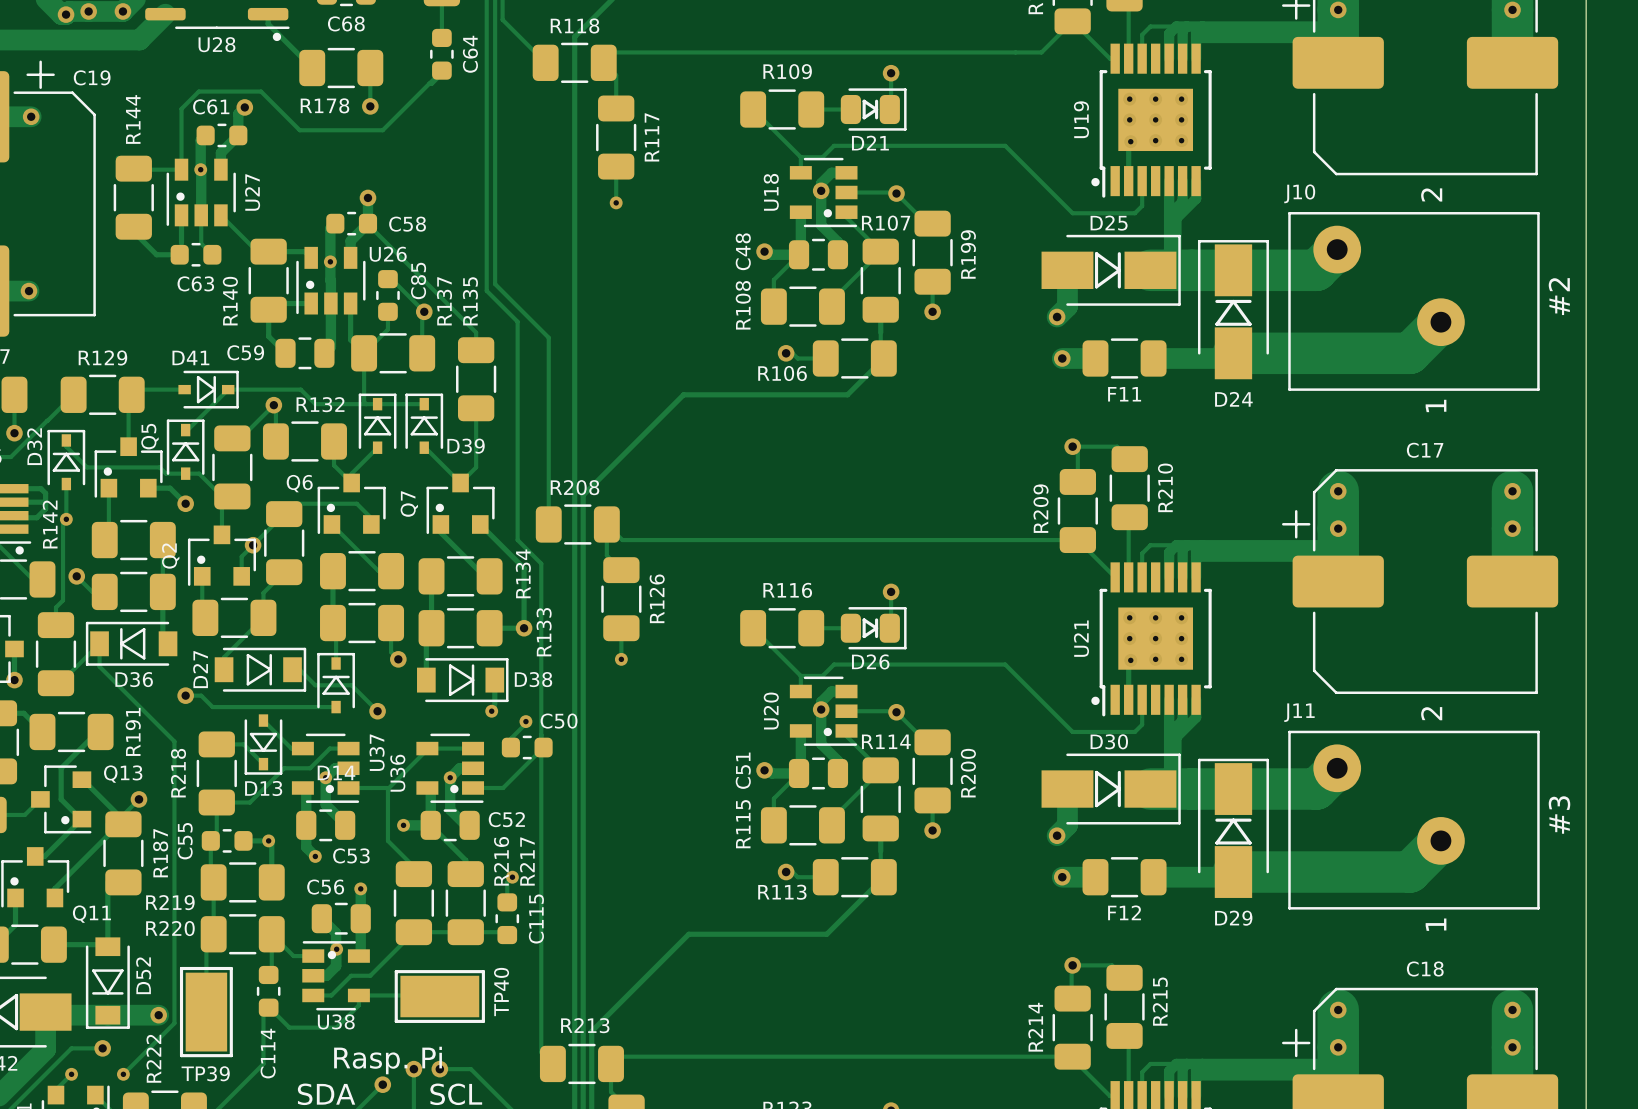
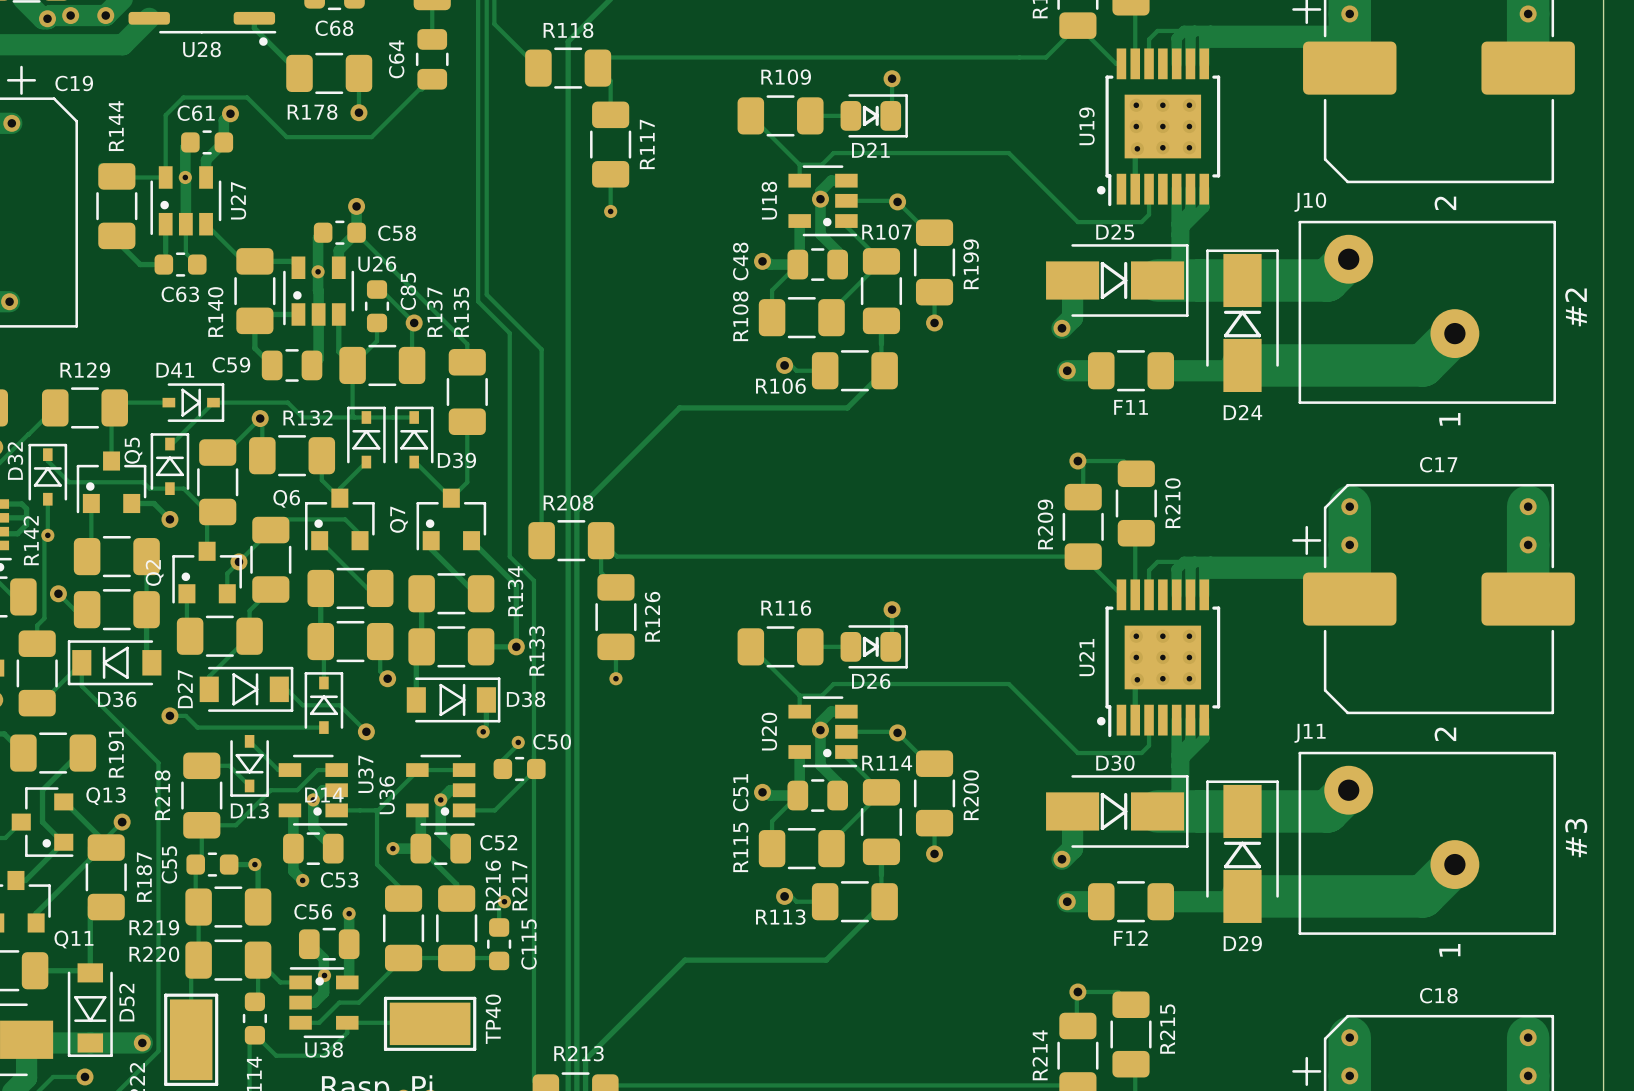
C64 footprint: [430, 28, 454, 80] -> [415, 29, 449, 90]
C64 name position: C64 (470, 54) -> C64 (396, 59)

